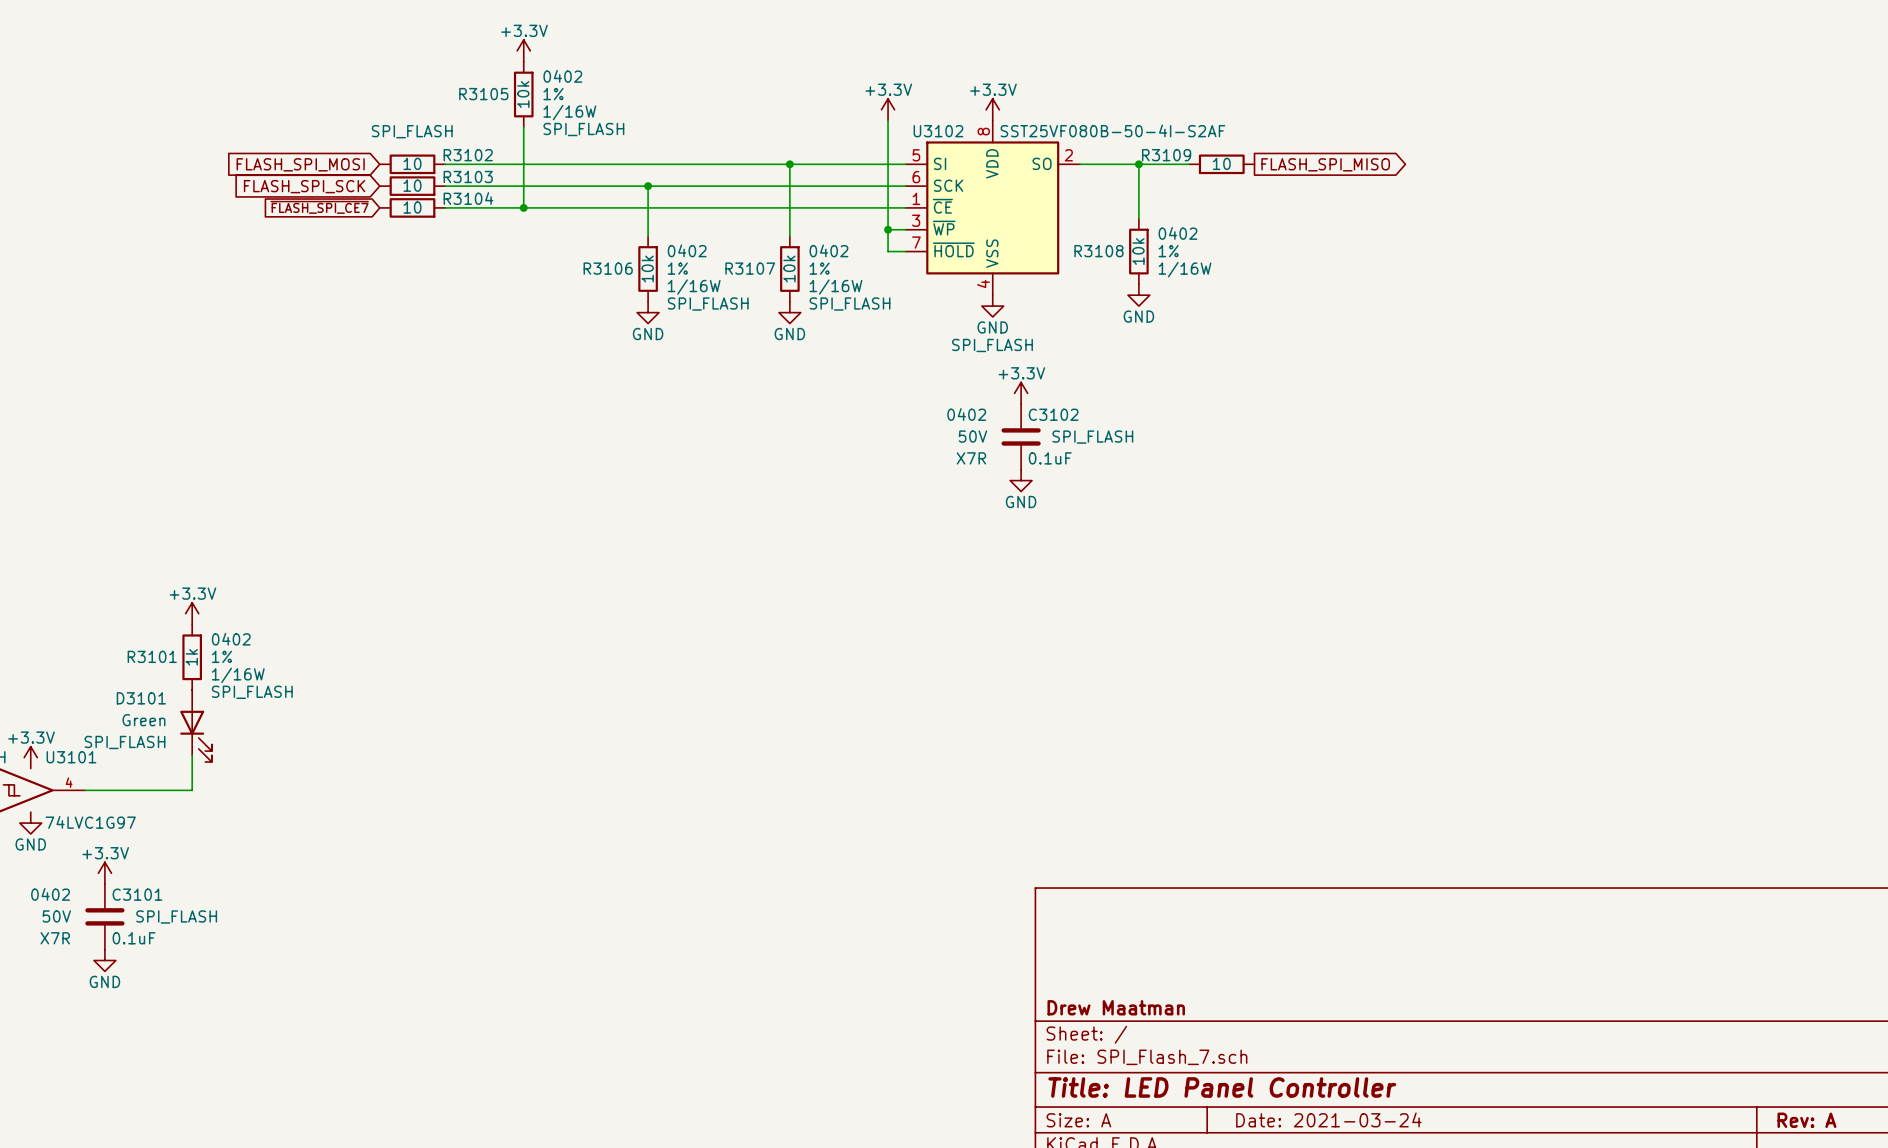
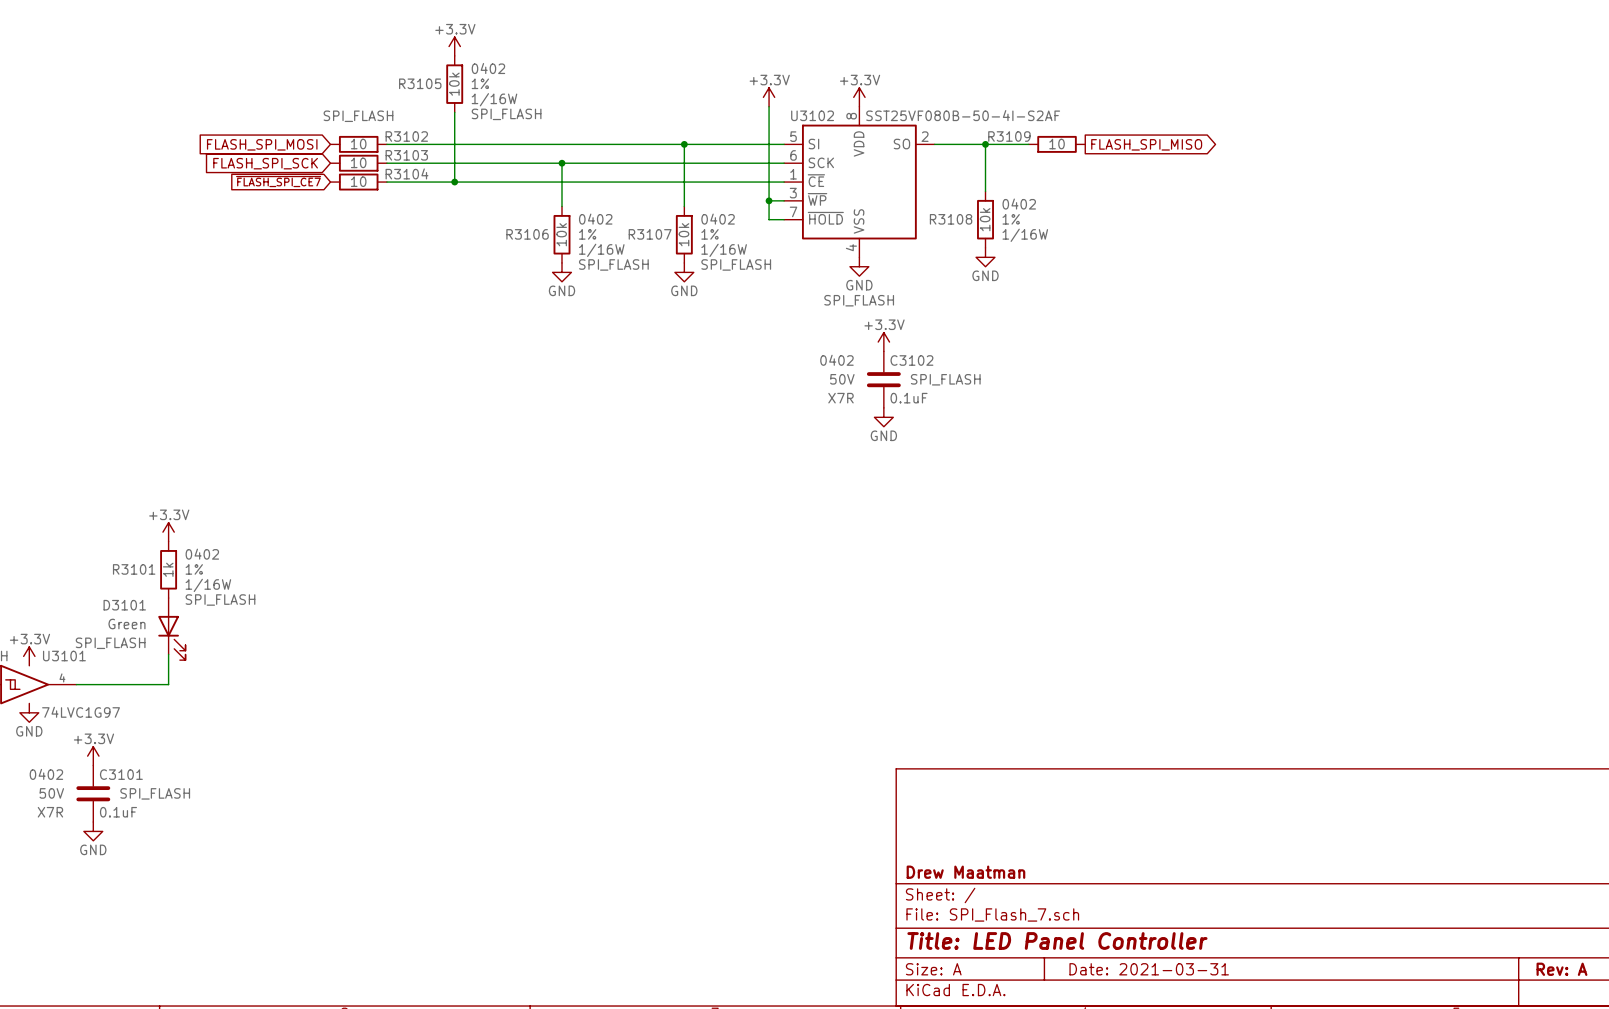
title block: Date: 2021-03-24 (1328, 1119) -> Date: 2021-03-31 (1149, 969)

